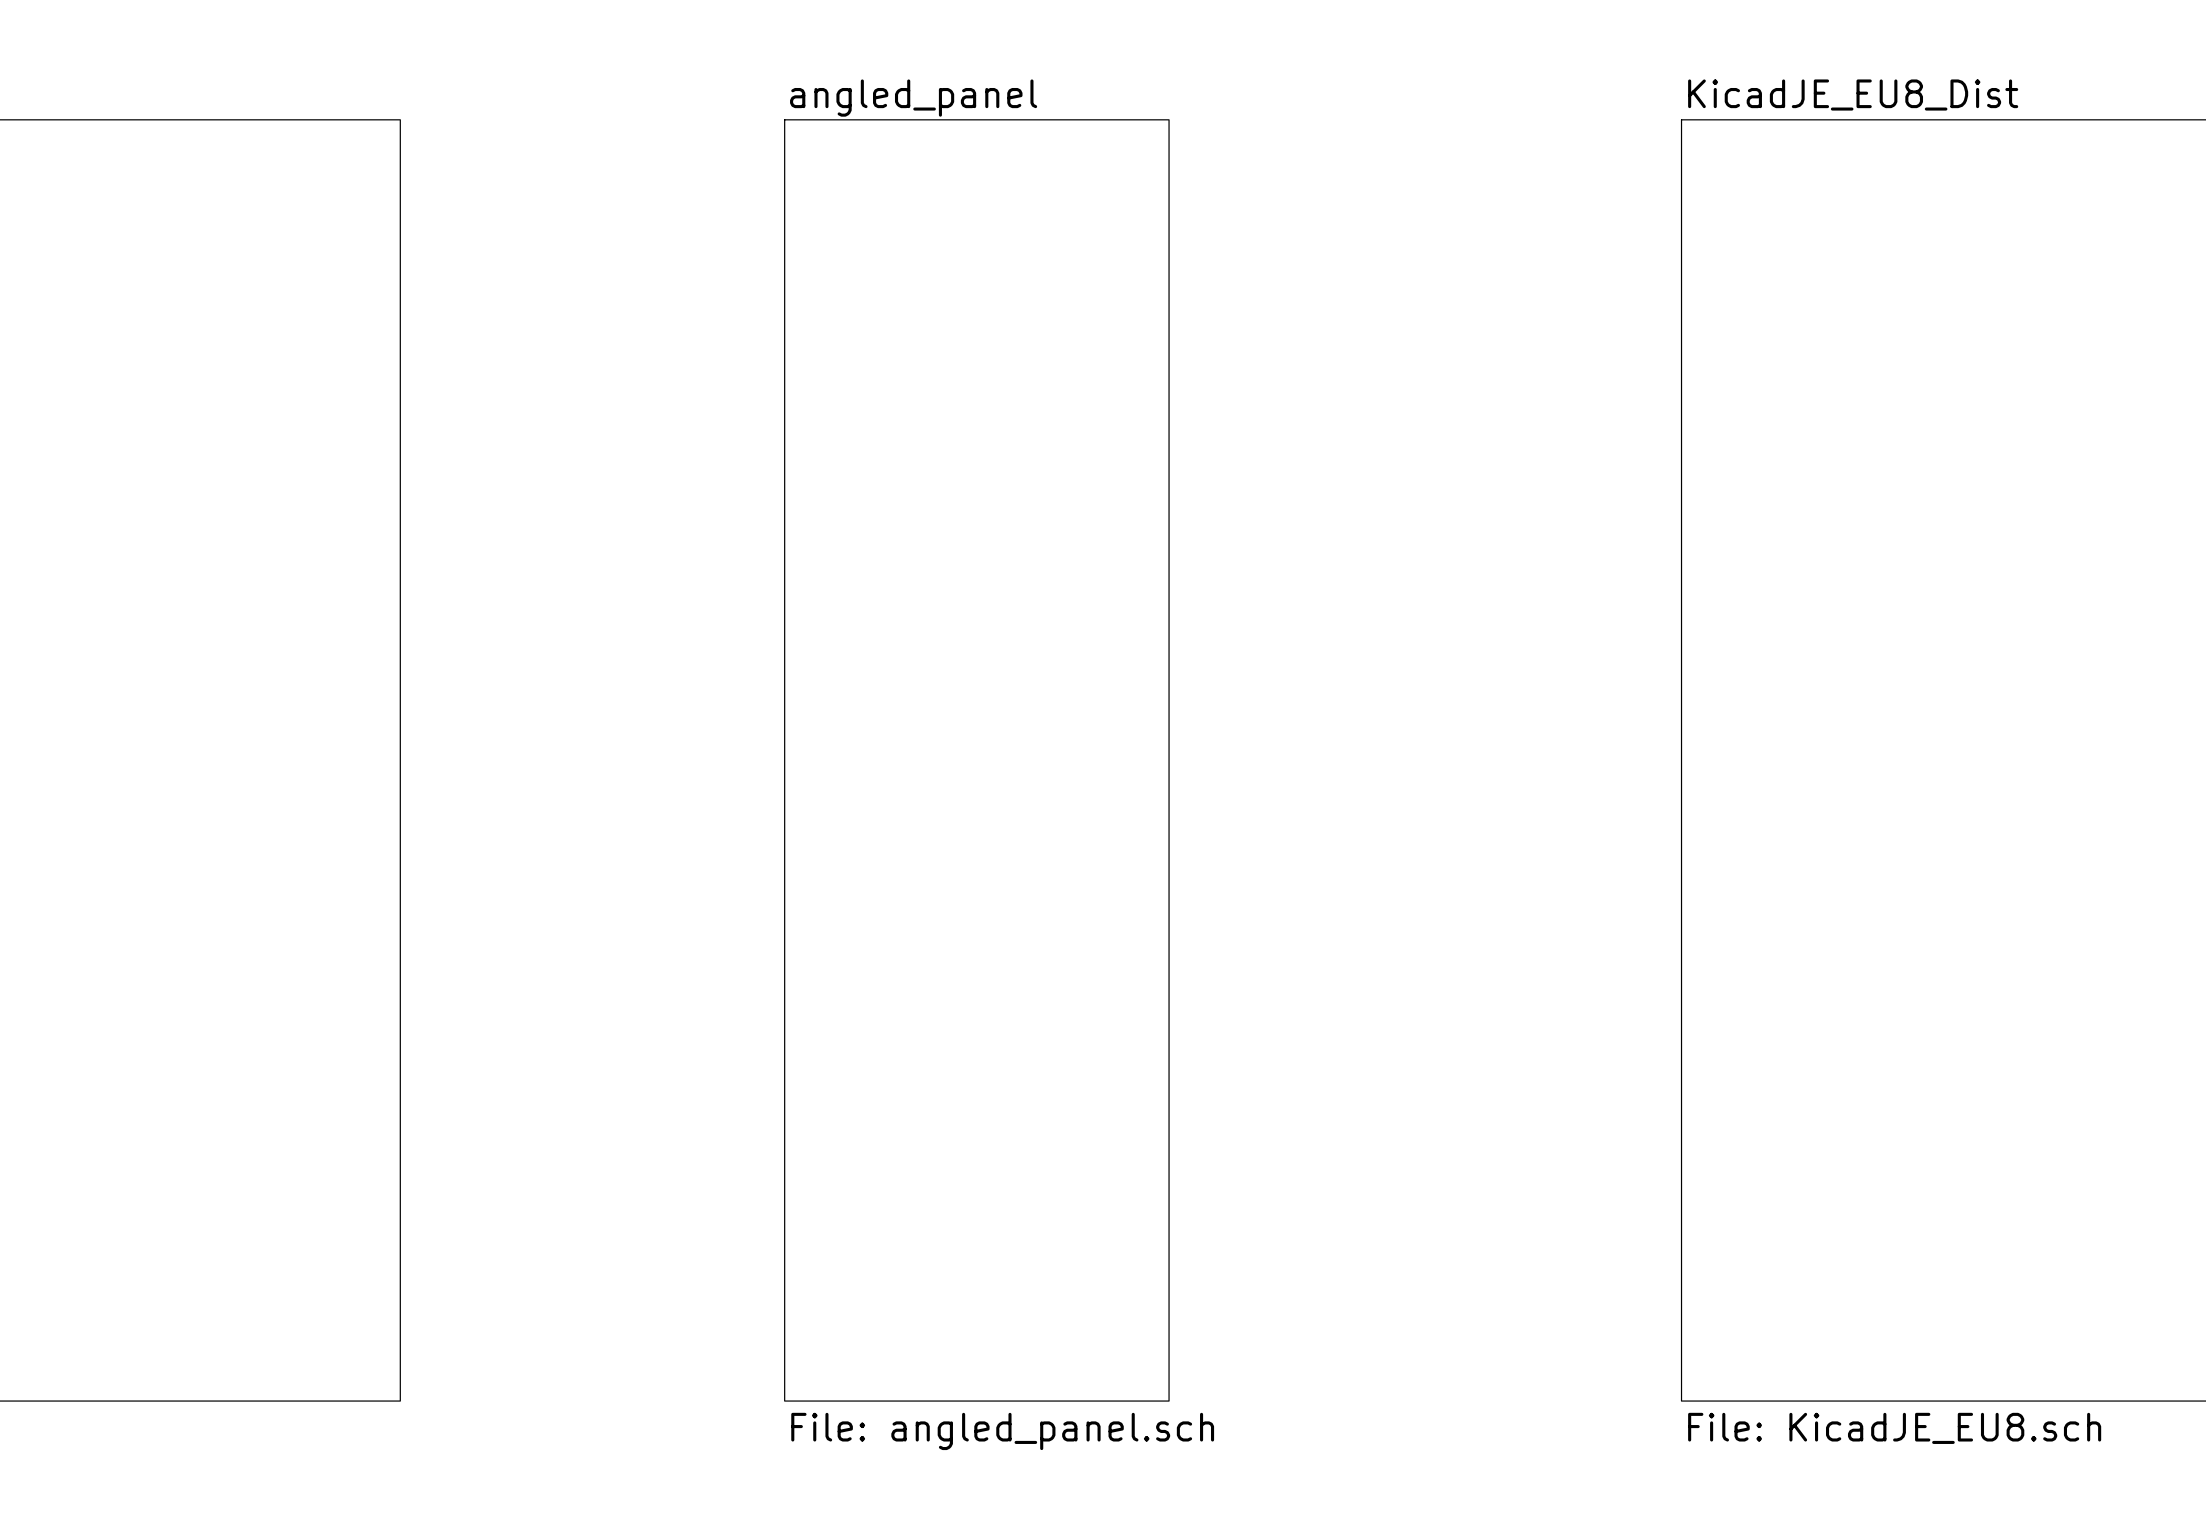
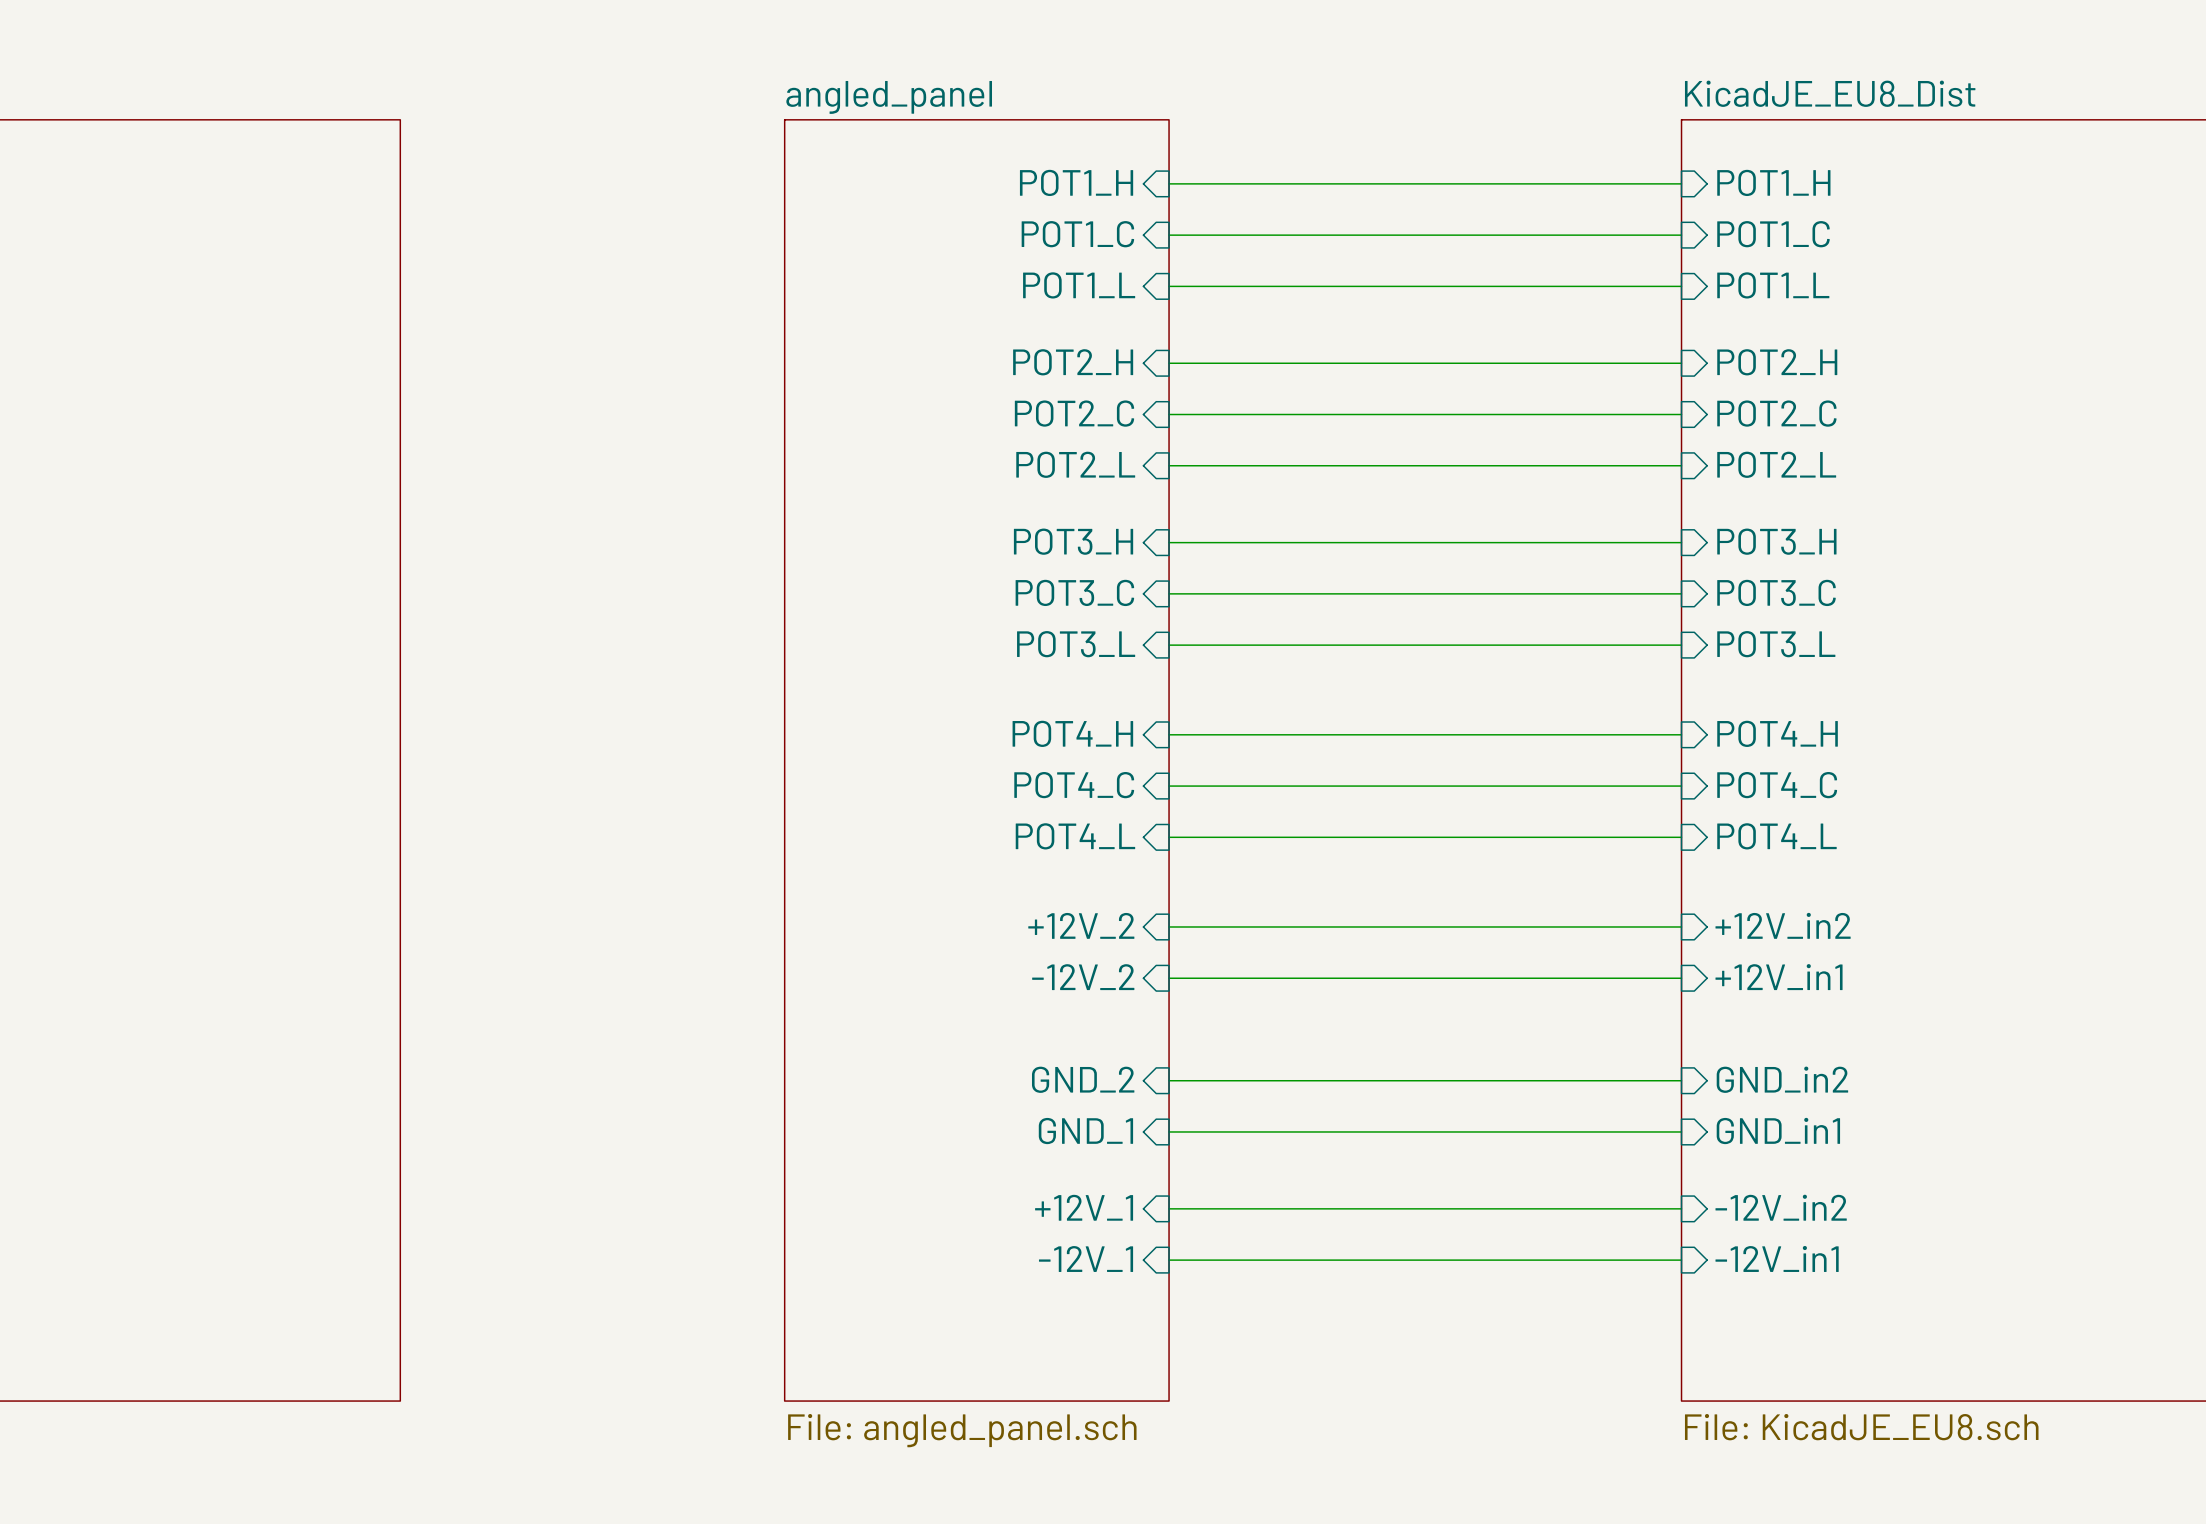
wire: none -> (1169, 183) (1681, 183)
sheet pin: none -> POT1_H (1076, 182)
sheet pin: none -> POT1_H (1773, 182)
sheet pin: none -> POT1_C (1077, 234)
wire: none -> (1169, 235) (1681, 235)
sheet pin: none -> POT1_C (1773, 234)
sheet pin: none -> POT1_L (1079, 285)
wire: none -> (1169, 286) (1681, 286)
sheet pin: none -> POT1_L (1773, 285)
sheet pin: none -> POT2_H (1073, 362)
wire: none -> (1169, 363) (1681, 363)
sheet pin: none -> POT2_H (1777, 362)
sheet pin: none -> POT2_C (1074, 413)
wire: none -> (1169, 414) (1681, 414)
sheet pin: none -> POT2_C (1776, 413)
wire: none -> (1169, 465) (1681, 465)
sheet pin: none -> POT2_L (1075, 464)
sheet pin: none -> POT2_L (1776, 464)
sheet pin: none -> POT3_H (1073, 541)
wire: none -> (1169, 542) (1681, 542)
sheet pin: none -> POT3_H (1776, 541)
wire: none -> (1169, 593) (1681, 593)
sheet pin: none -> POT3_C (1074, 592)
sheet pin: none -> POT3_C (1776, 592)
sheet pin: none -> POT3_L (1076, 644)
wire: none -> (1169, 645) (1681, 645)
sheet pin: none -> POT3_L (1776, 644)
sheet pin: none -> POT4_H (1072, 733)
wire: none -> (1169, 734) (1681, 734)
sheet pin: none -> POT4_H (1777, 733)
sheet pin: none -> POT4_C (1074, 785)
sheet pin: none -> POT4_C (1777, 785)
wire: none -> (1169, 786) (1681, 786)
sheet pin: none -> POT4_L (1075, 836)
sheet pin: none -> POT4_L (1776, 836)
wire: none -> (1169, 837) (1681, 837)
wire: none -> (1169, 926) (1681, 926)
sheet pin: none -> +12V_2 (1081, 925)
sheet pin: none -> +12V_in2 (1783, 925)
sheet pin: none -> -12V_2 (1083, 977)
wire: none -> (1169, 978) (1681, 978)
sheet pin: none -> +12V_in1 (1779, 977)
wire: none -> (1169, 1080) (1681, 1080)
sheet pin: none -> GND_2 (1083, 1079)
sheet pin: none -> GND_in2 (1782, 1079)
wire: none -> (1169, 1131) (1681, 1131)
sheet pin: none -> GND_1 (1085, 1131)
sheet pin: none -> GND_in1 (1778, 1130)
wire: none -> (1169, 1208) (1681, 1208)
sheet pin: none -> +12V_1 (1084, 1207)
sheet pin: none -> -12V_in2 (1781, 1207)
sheet pin: none -> -12V_1 (1086, 1259)
wire: none -> (1169, 1260) (1681, 1260)
sheet pin: none -> -12V_in1 (1777, 1258)

